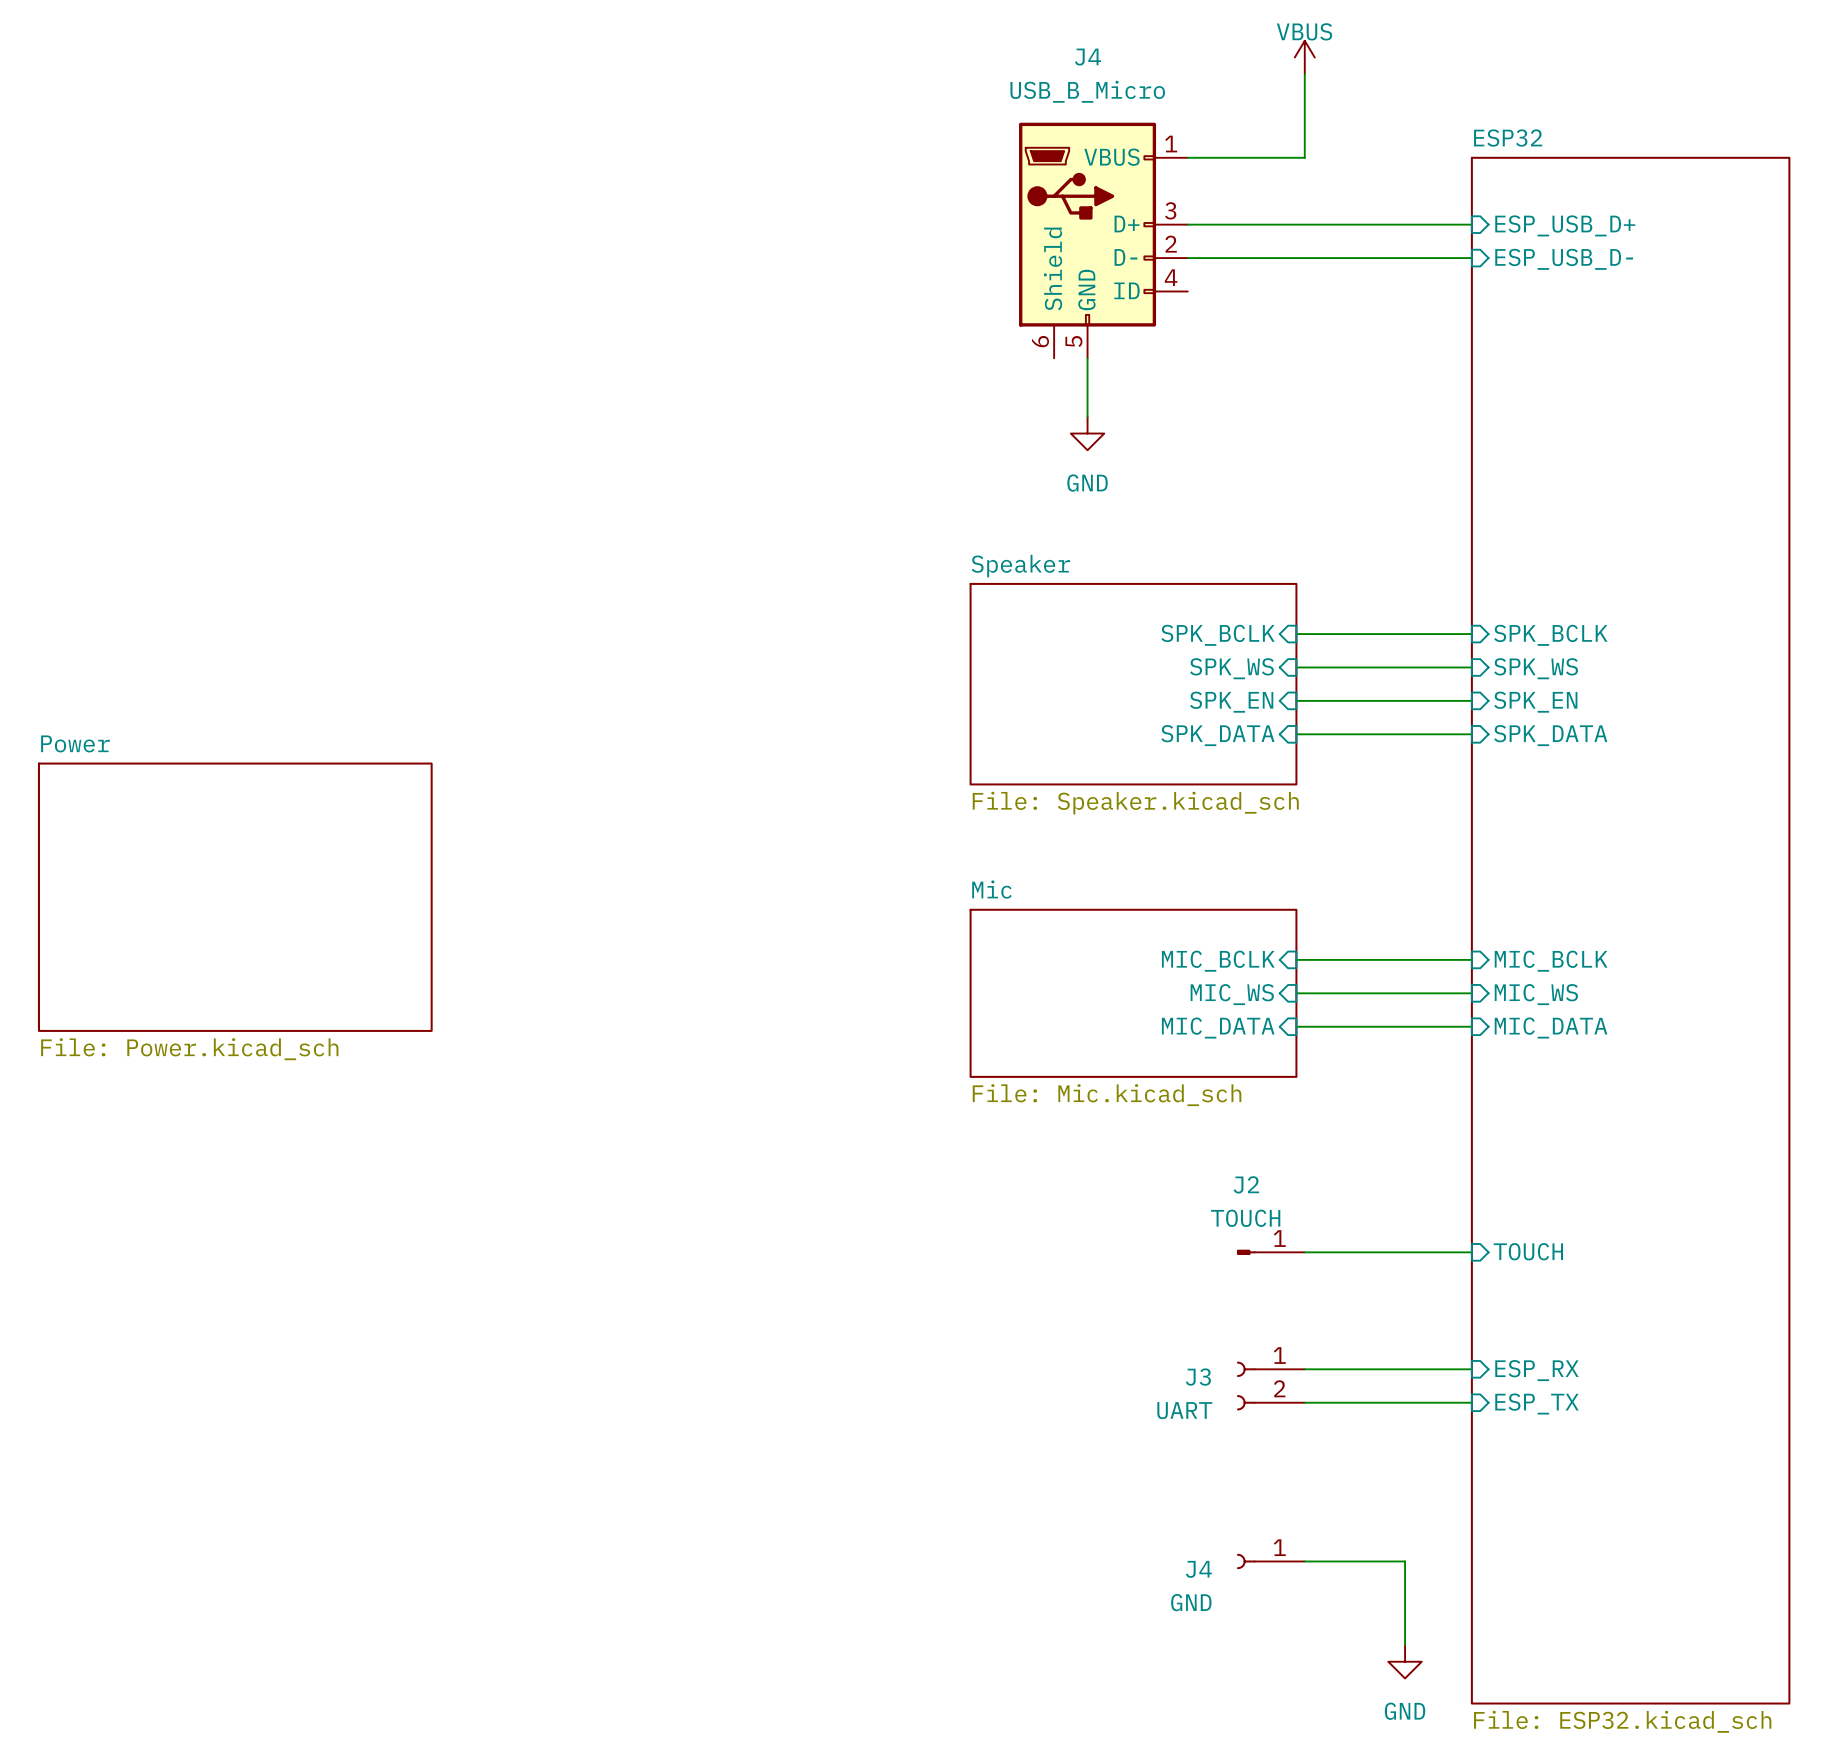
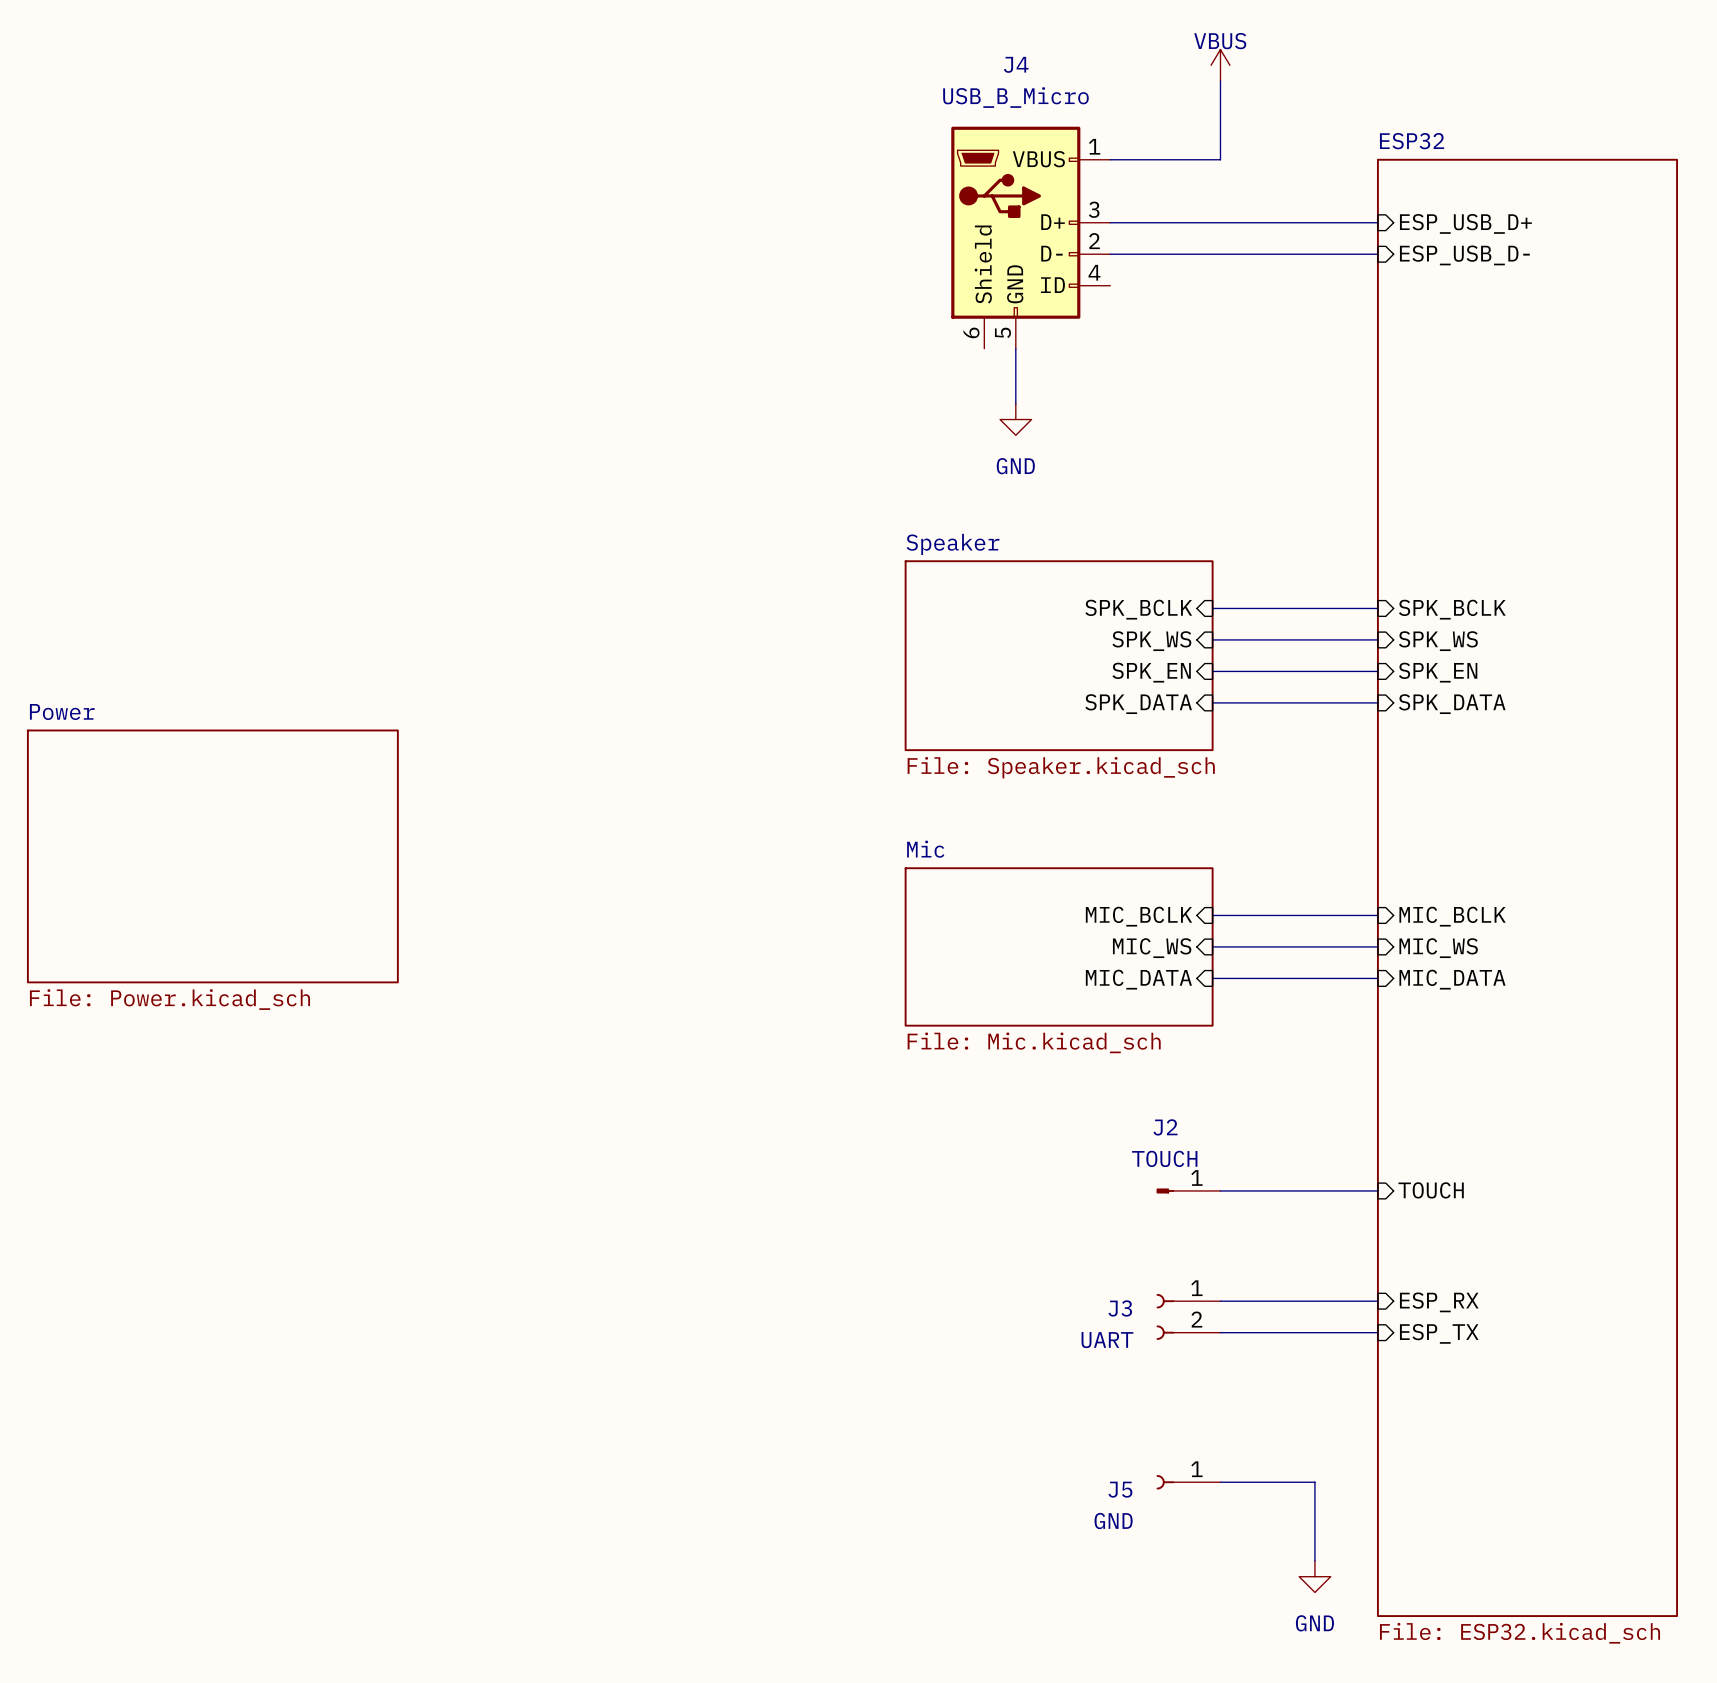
J4 name: J4 (1198, 1569) -> J5 (1120, 1489)

